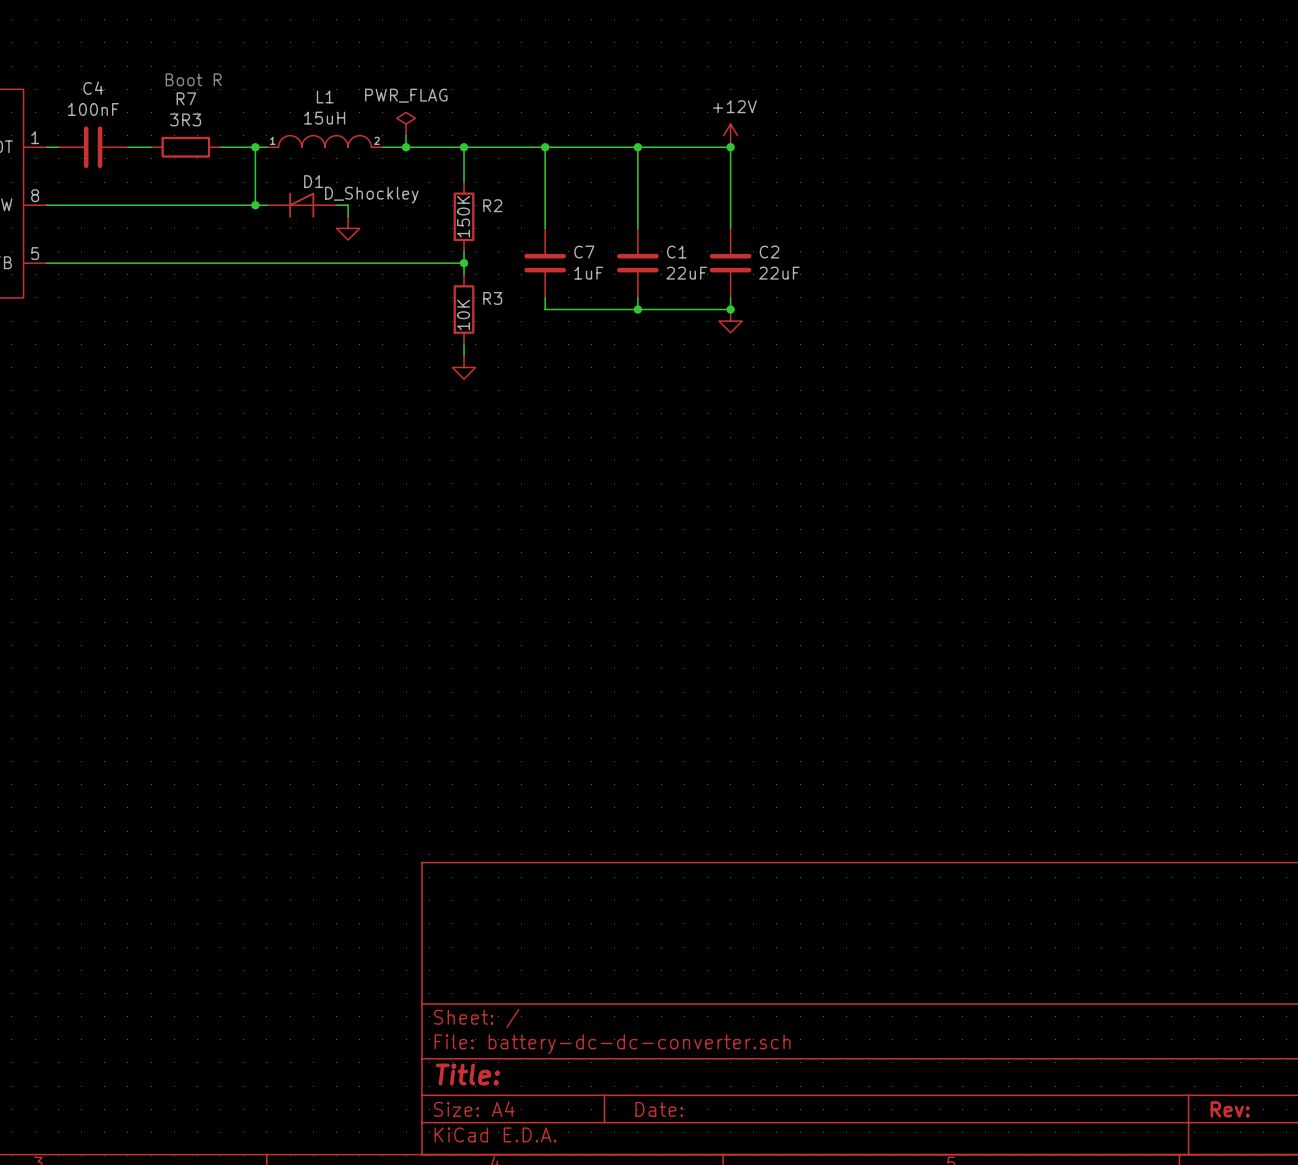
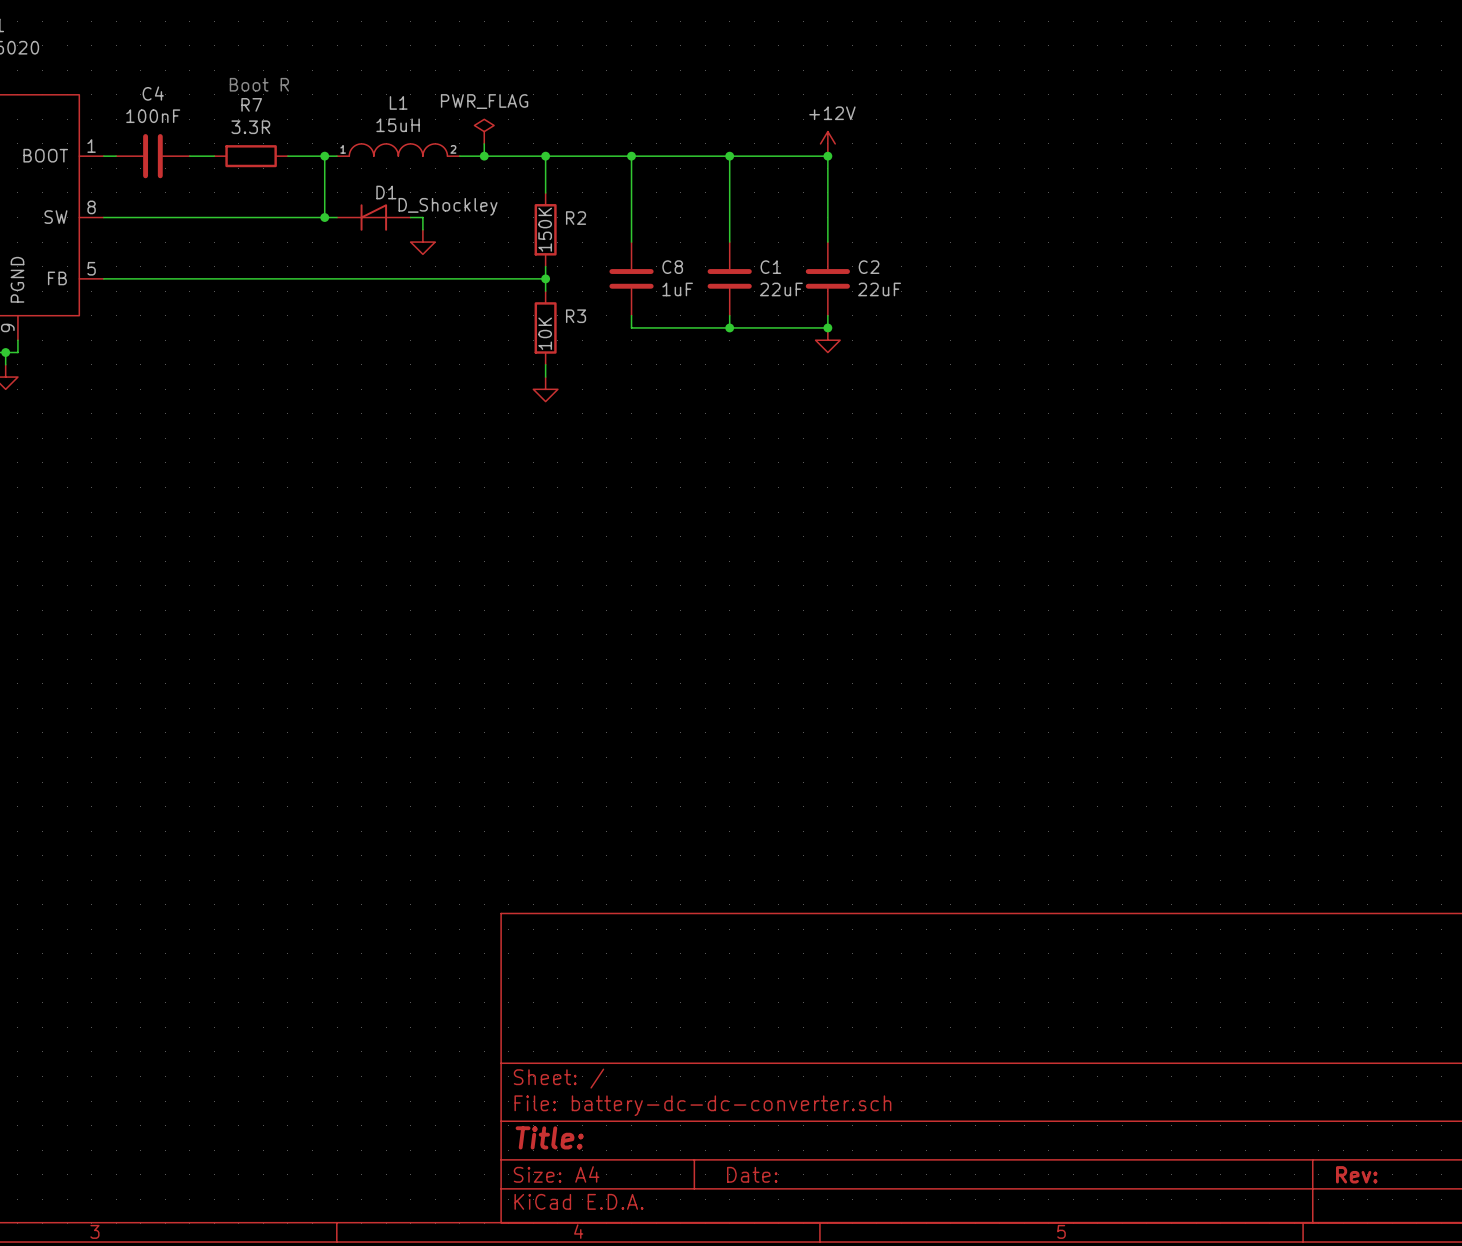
R7 value: 3R3 (185, 119) -> 3.3R (250, 127)
C7 name: C7 (584, 252) -> C8 (672, 267)

